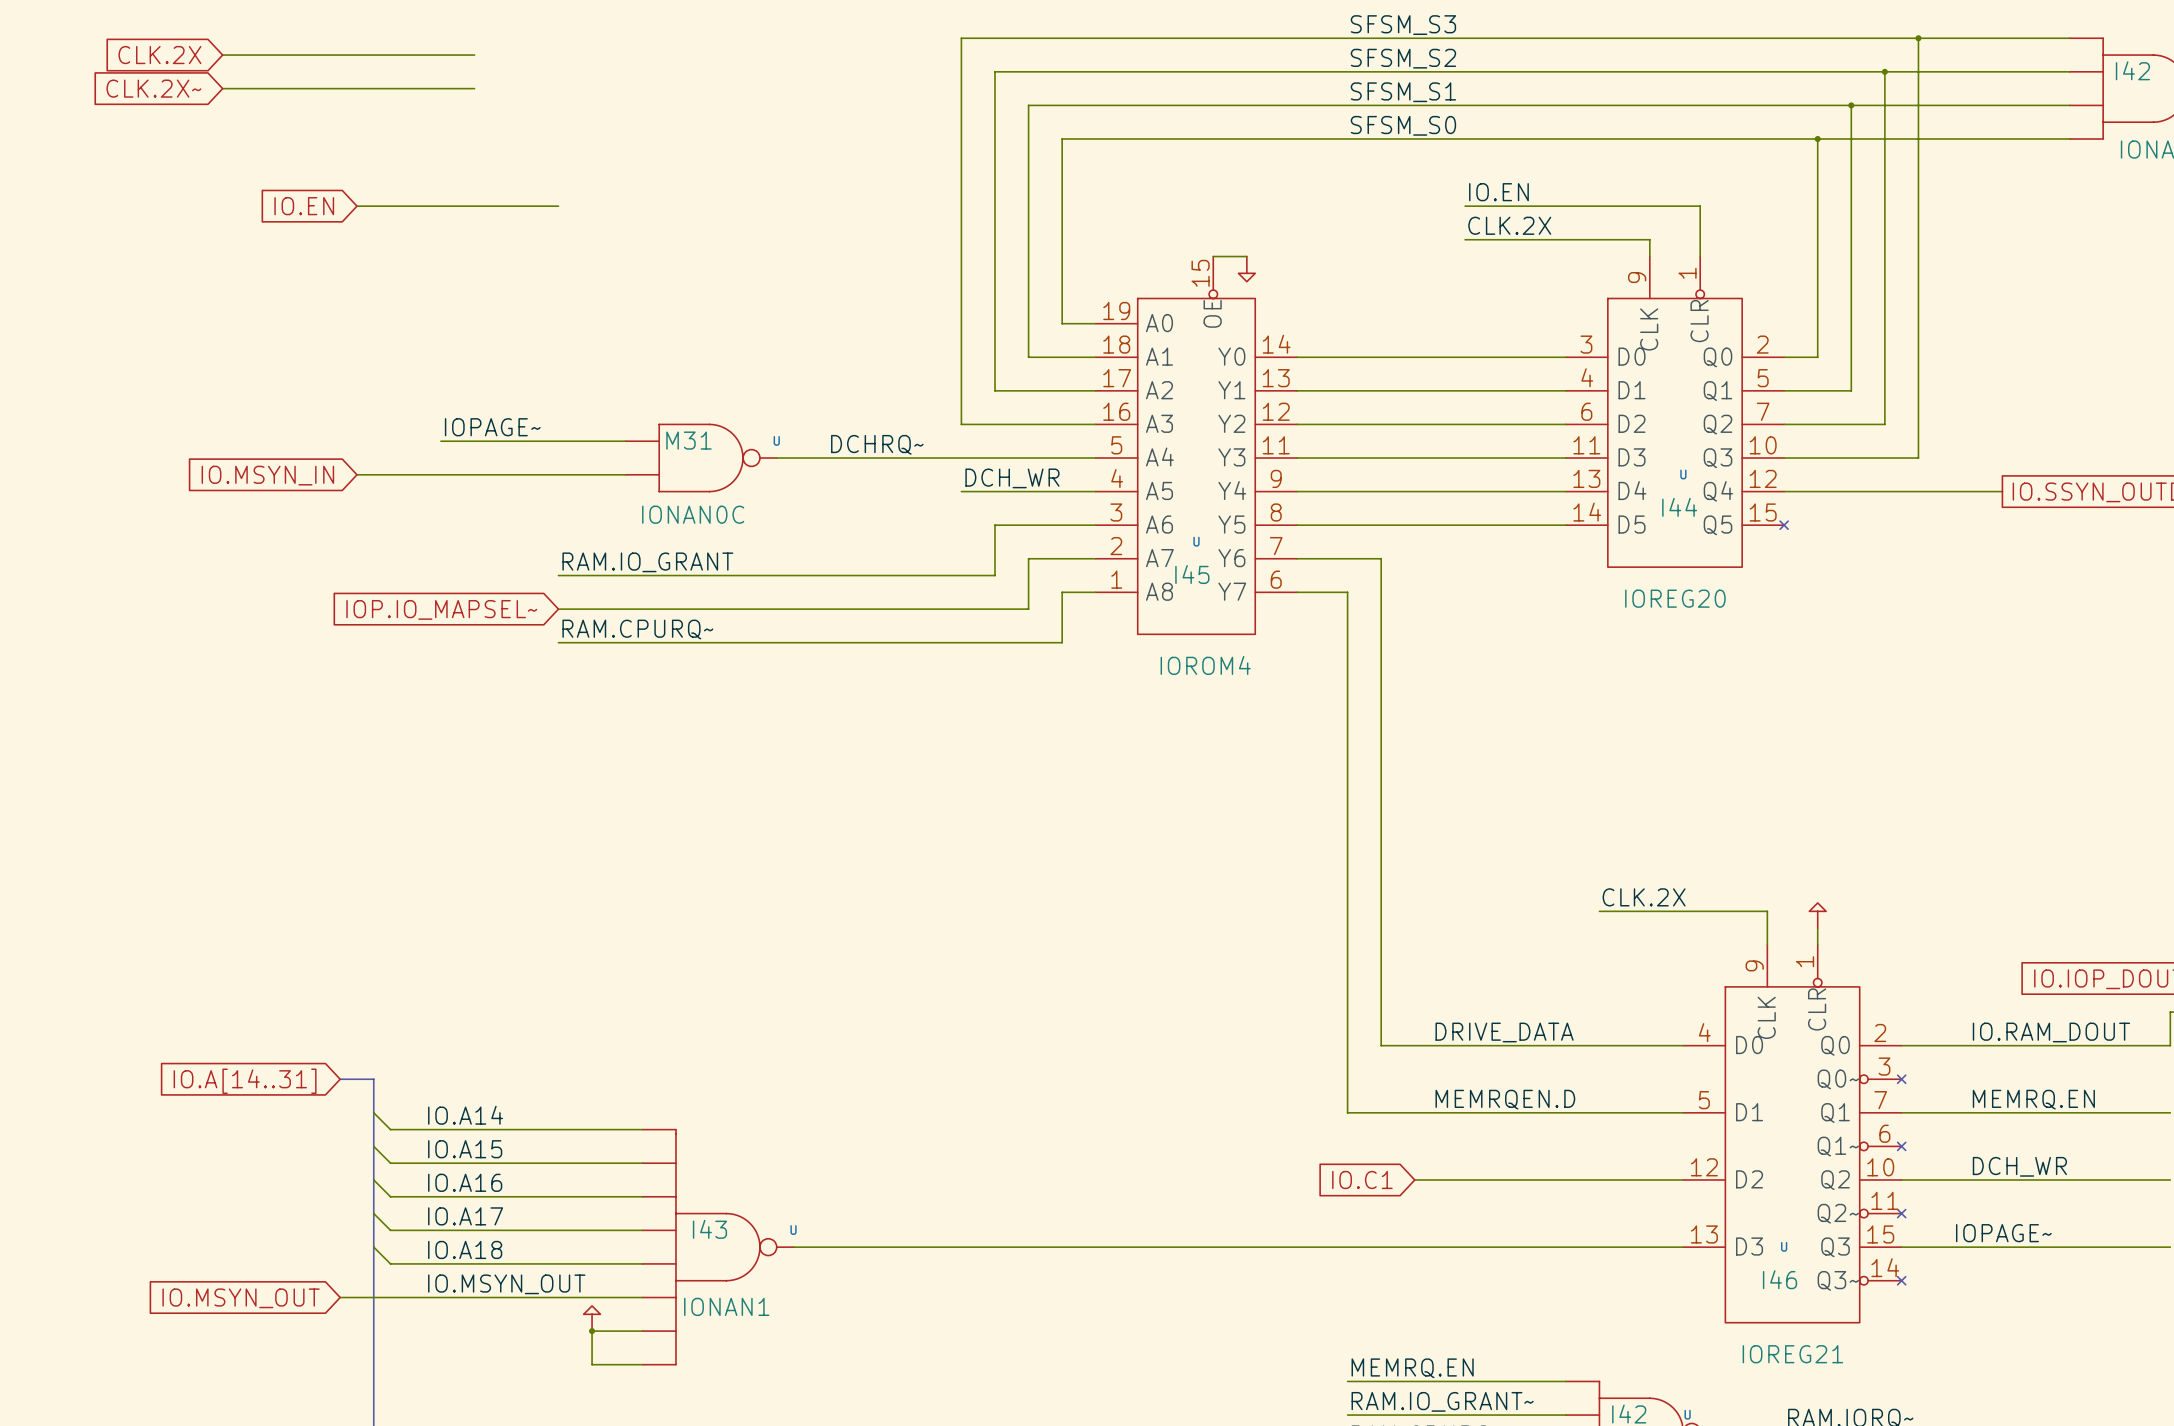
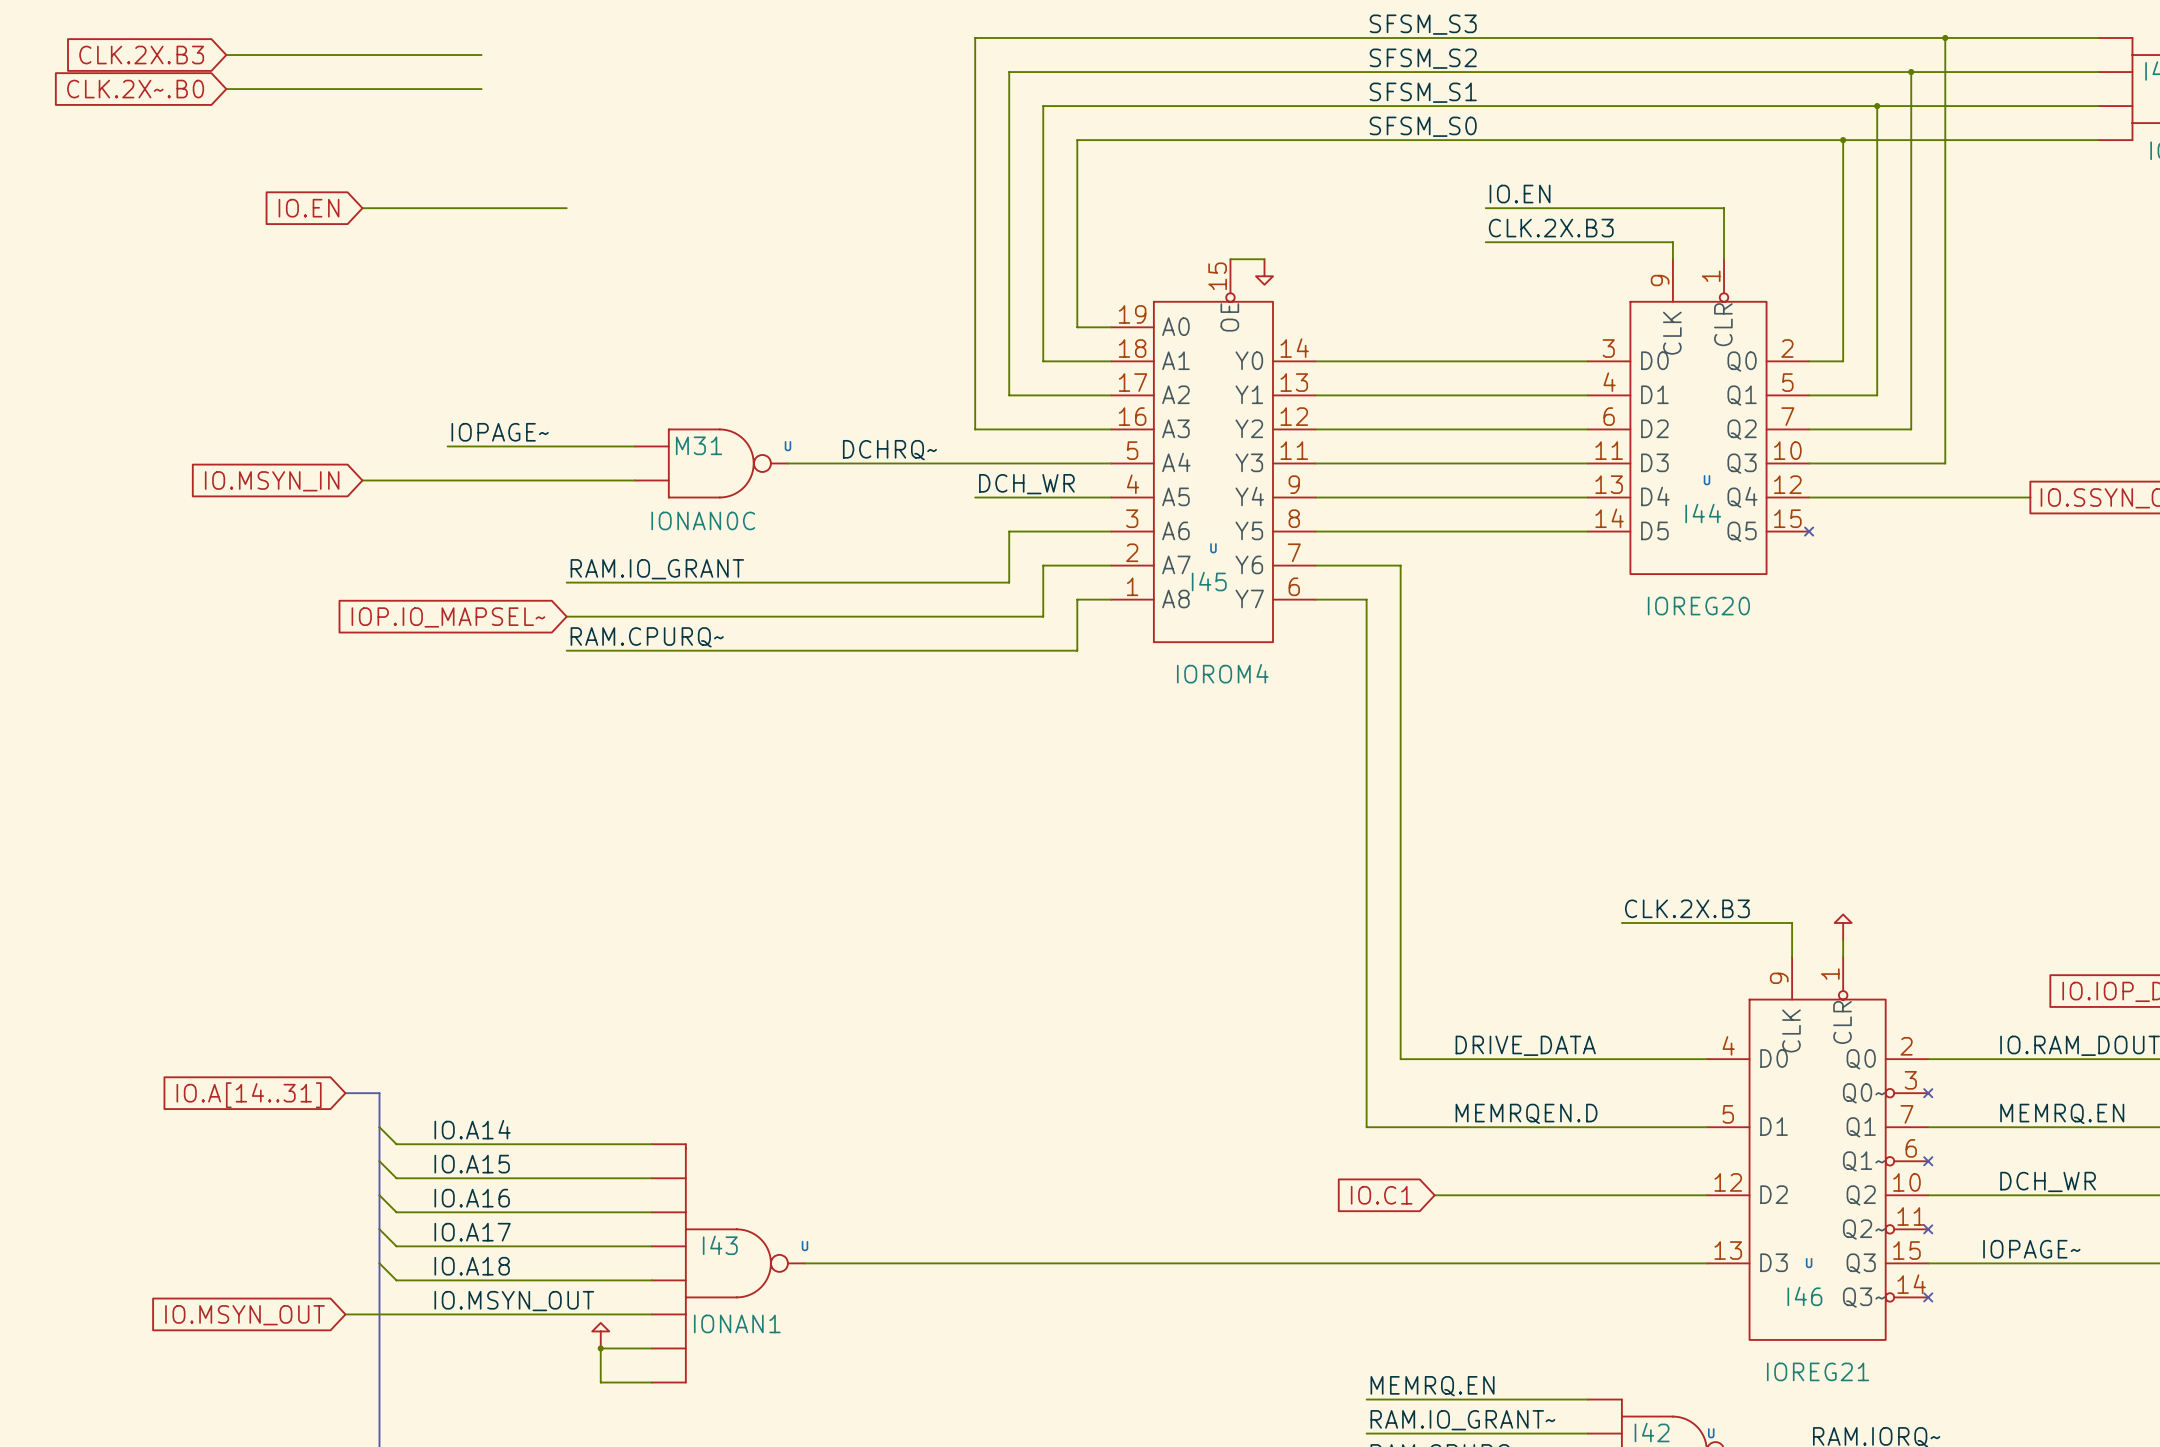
global label: CLK.2X (159, 55) -> CLK.2X.B3 (141, 55)
global label: CLK.2X~ (153, 88) -> CLK.2X~.B0 (135, 89)
label: CLK.2X (1509, 225) -> CLK.2X.B3 (1551, 228)
label: CLK.2X (1644, 897) -> CLK.2X.B3 (1687, 908)

